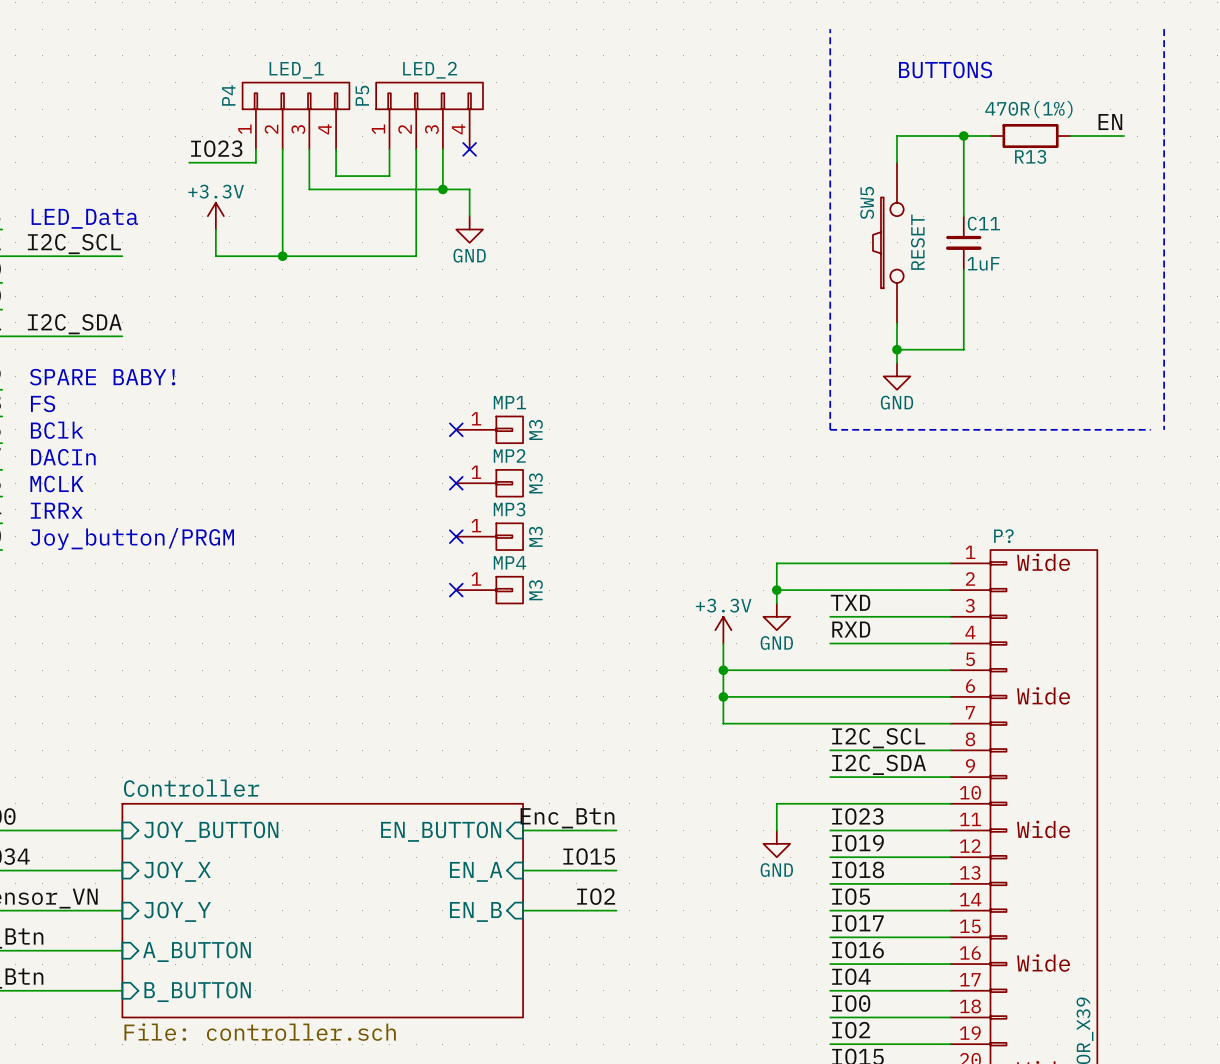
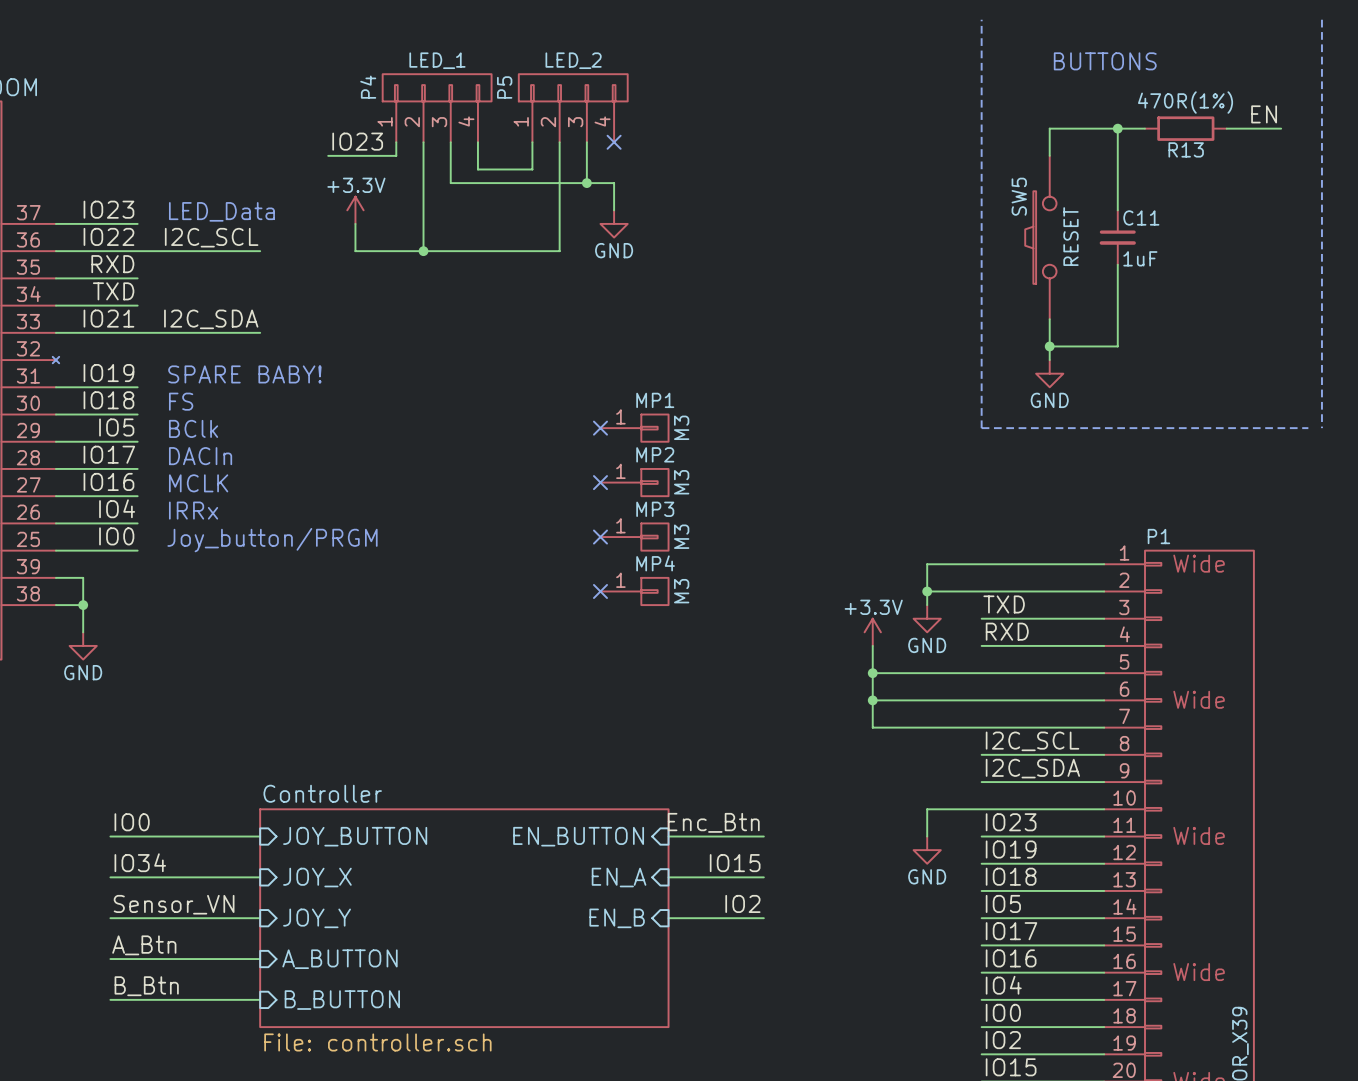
P? name: P? (1003, 536) -> P1 (1158, 536)

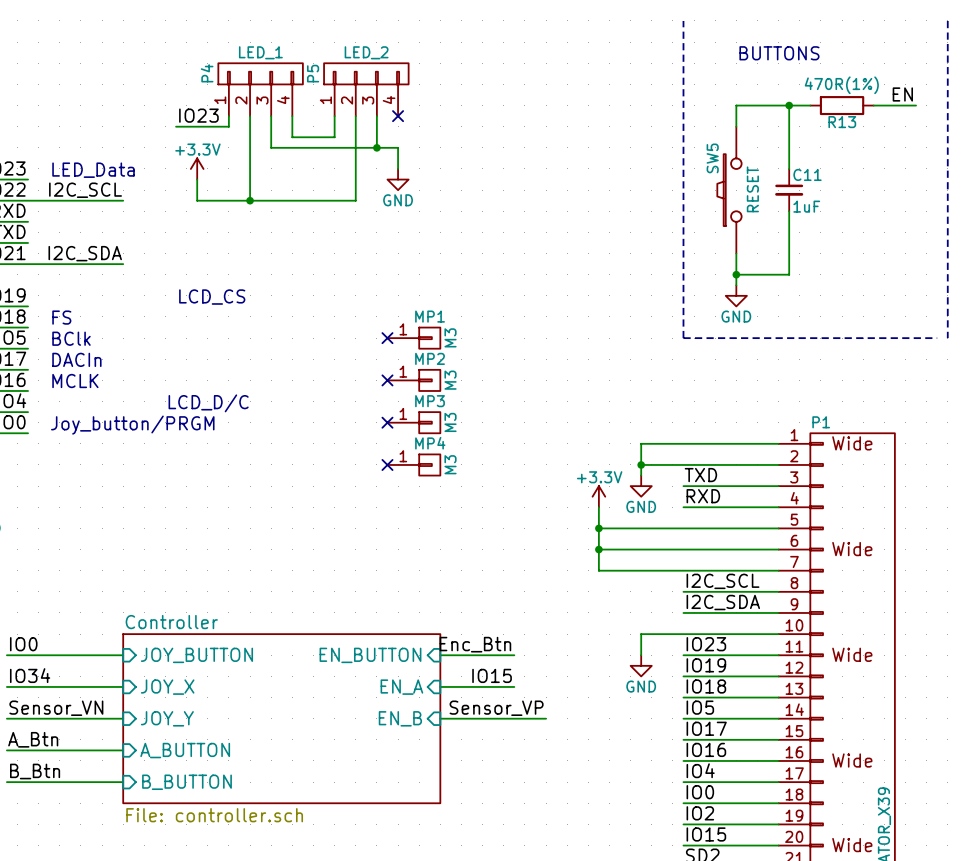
text: SPARE BABY! (244, 374) -> none
text: none -> LCD_CS (212, 297)
text: IRRx (193, 510) -> none
text: none -> LCD_D/C (208, 403)
label: IO2 (742, 903) -> none
label: none -> Sensor_VP (496, 708)
wire: none -> (514, 718) (546, 718)

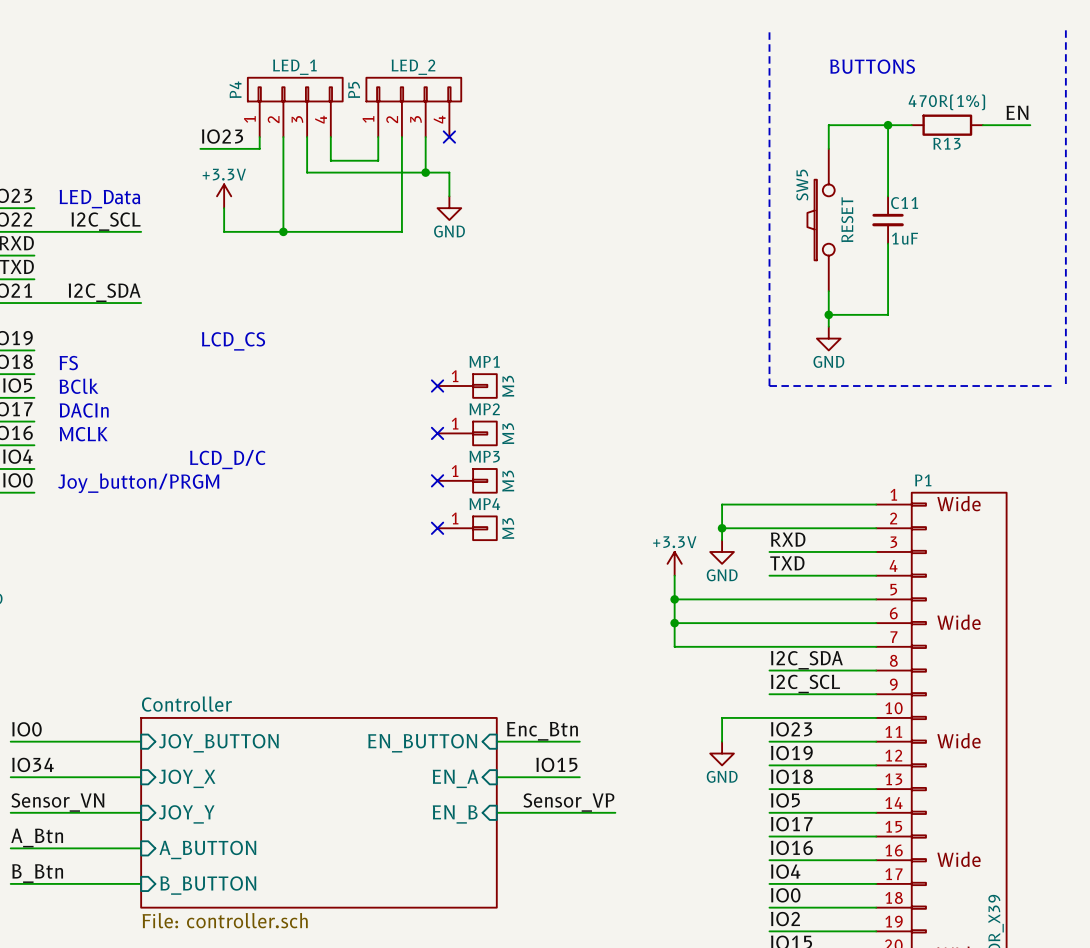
label: TXD (700, 475) -> RXD (788, 539)
label: RXD (703, 496) -> TXD (787, 563)
label: I2C_SCL (722, 581) -> I2C_SDA (806, 660)
label: I2C_SDA (723, 602) -> I2C_SCL (805, 683)

